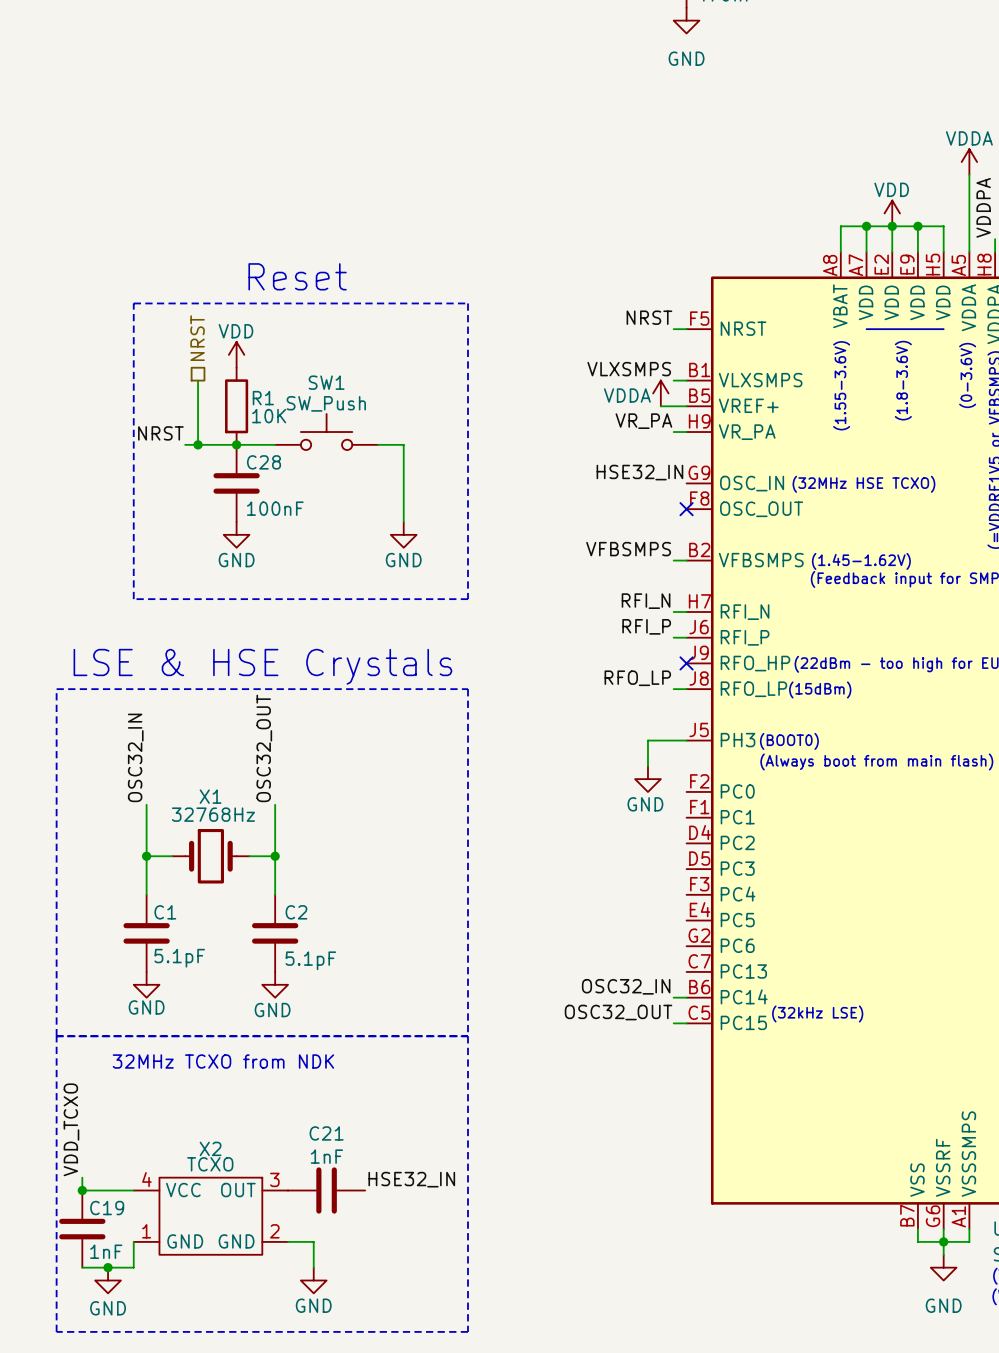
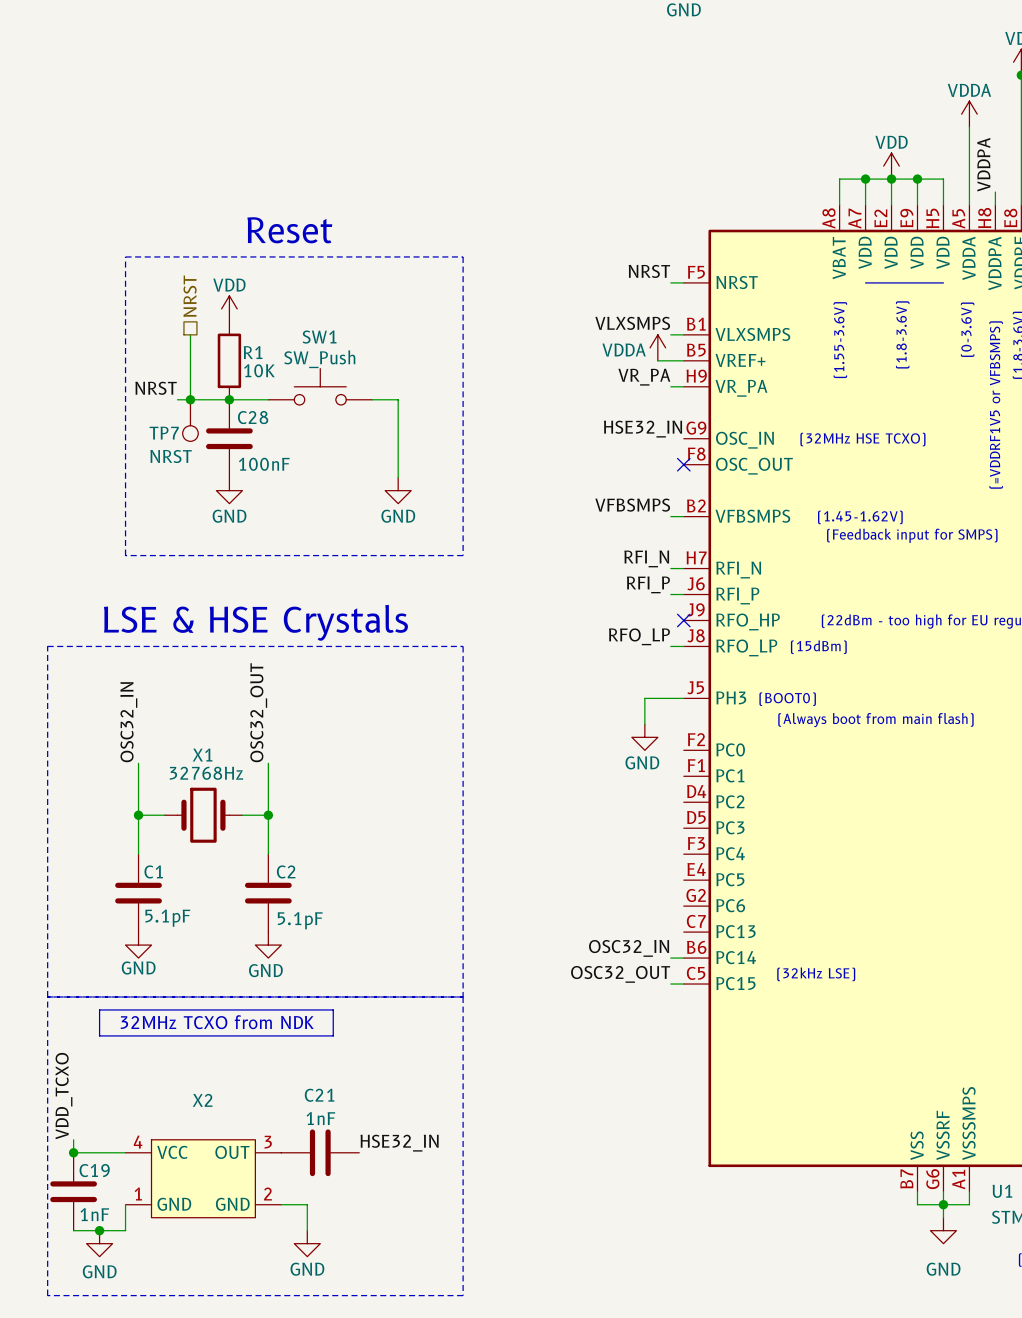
TP7: none -> NRST (190, 420)
line: none -> (99, 1009) (333, 1009) (333, 1035) (99, 1035) (99, 1009)
X2 value: TCXO (210, 1164) -> none
X2 symbol: [133, 1177, 289, 1255] -> [125, 1139, 282, 1218]

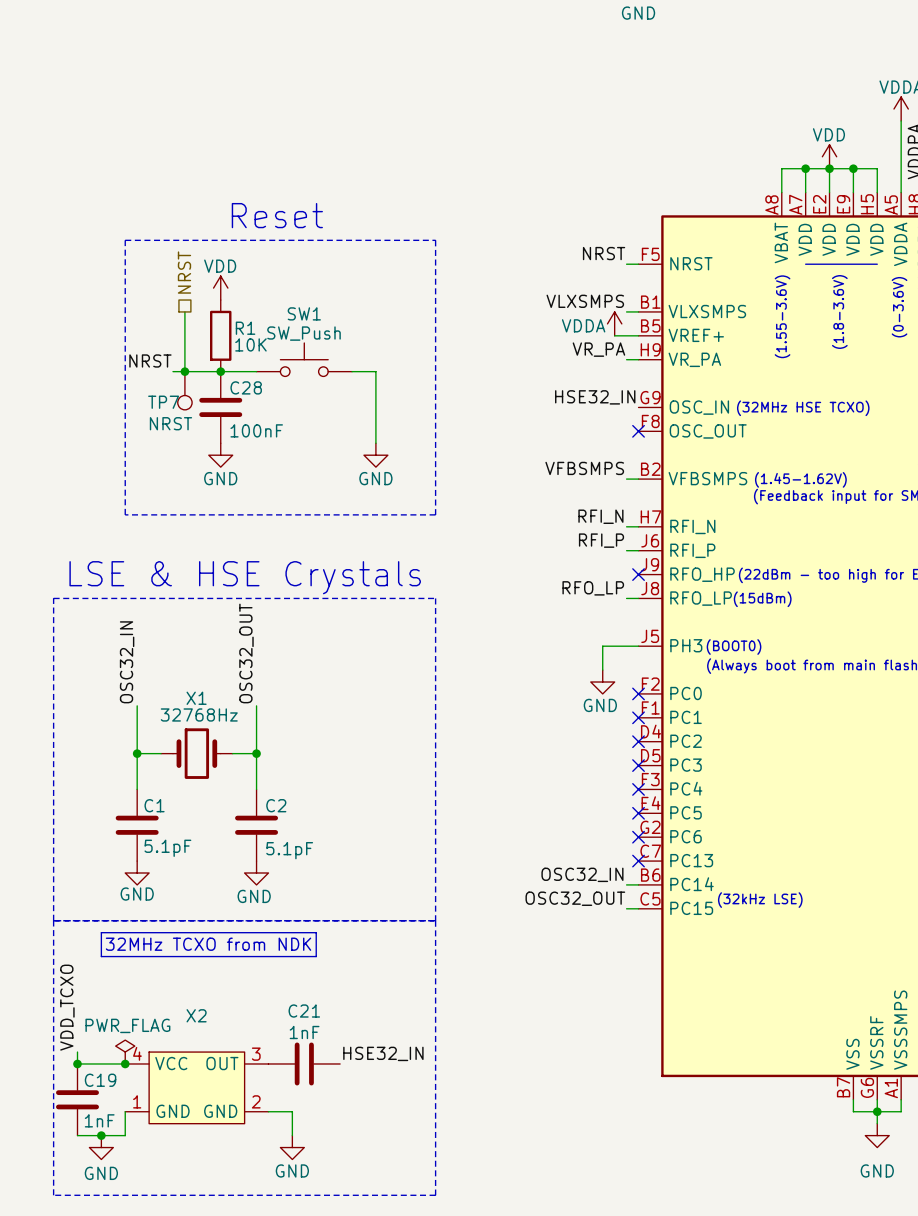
no-connect mark: none -> (638, 693)
no-connect mark: none -> (638, 717)
no-connect mark: none -> (638, 741)
no-connect mark: none -> (638, 765)
no-connect mark: none -> (638, 789)
no-connect mark: none -> (638, 813)
no-connect mark: none -> (638, 837)
no-connect mark: none -> (638, 861)
power symbol: none -> PWR_FLAG (125, 1052)
junction: none -> (125, 1063)

